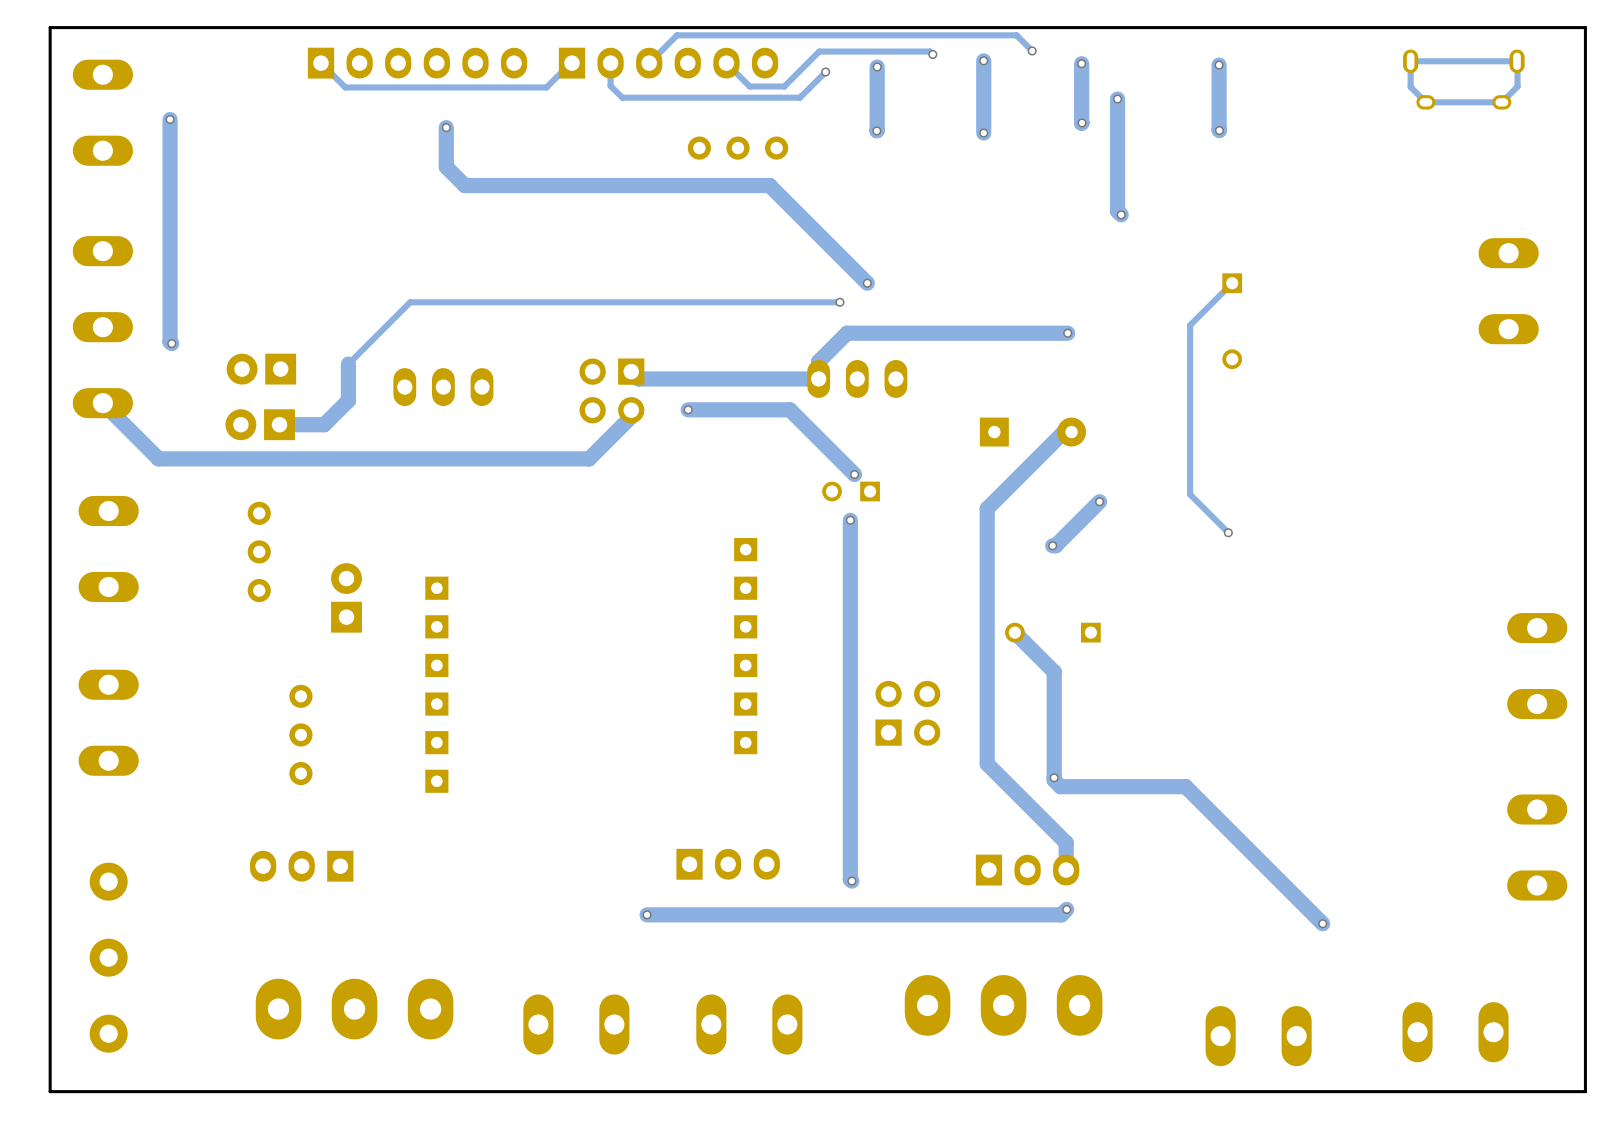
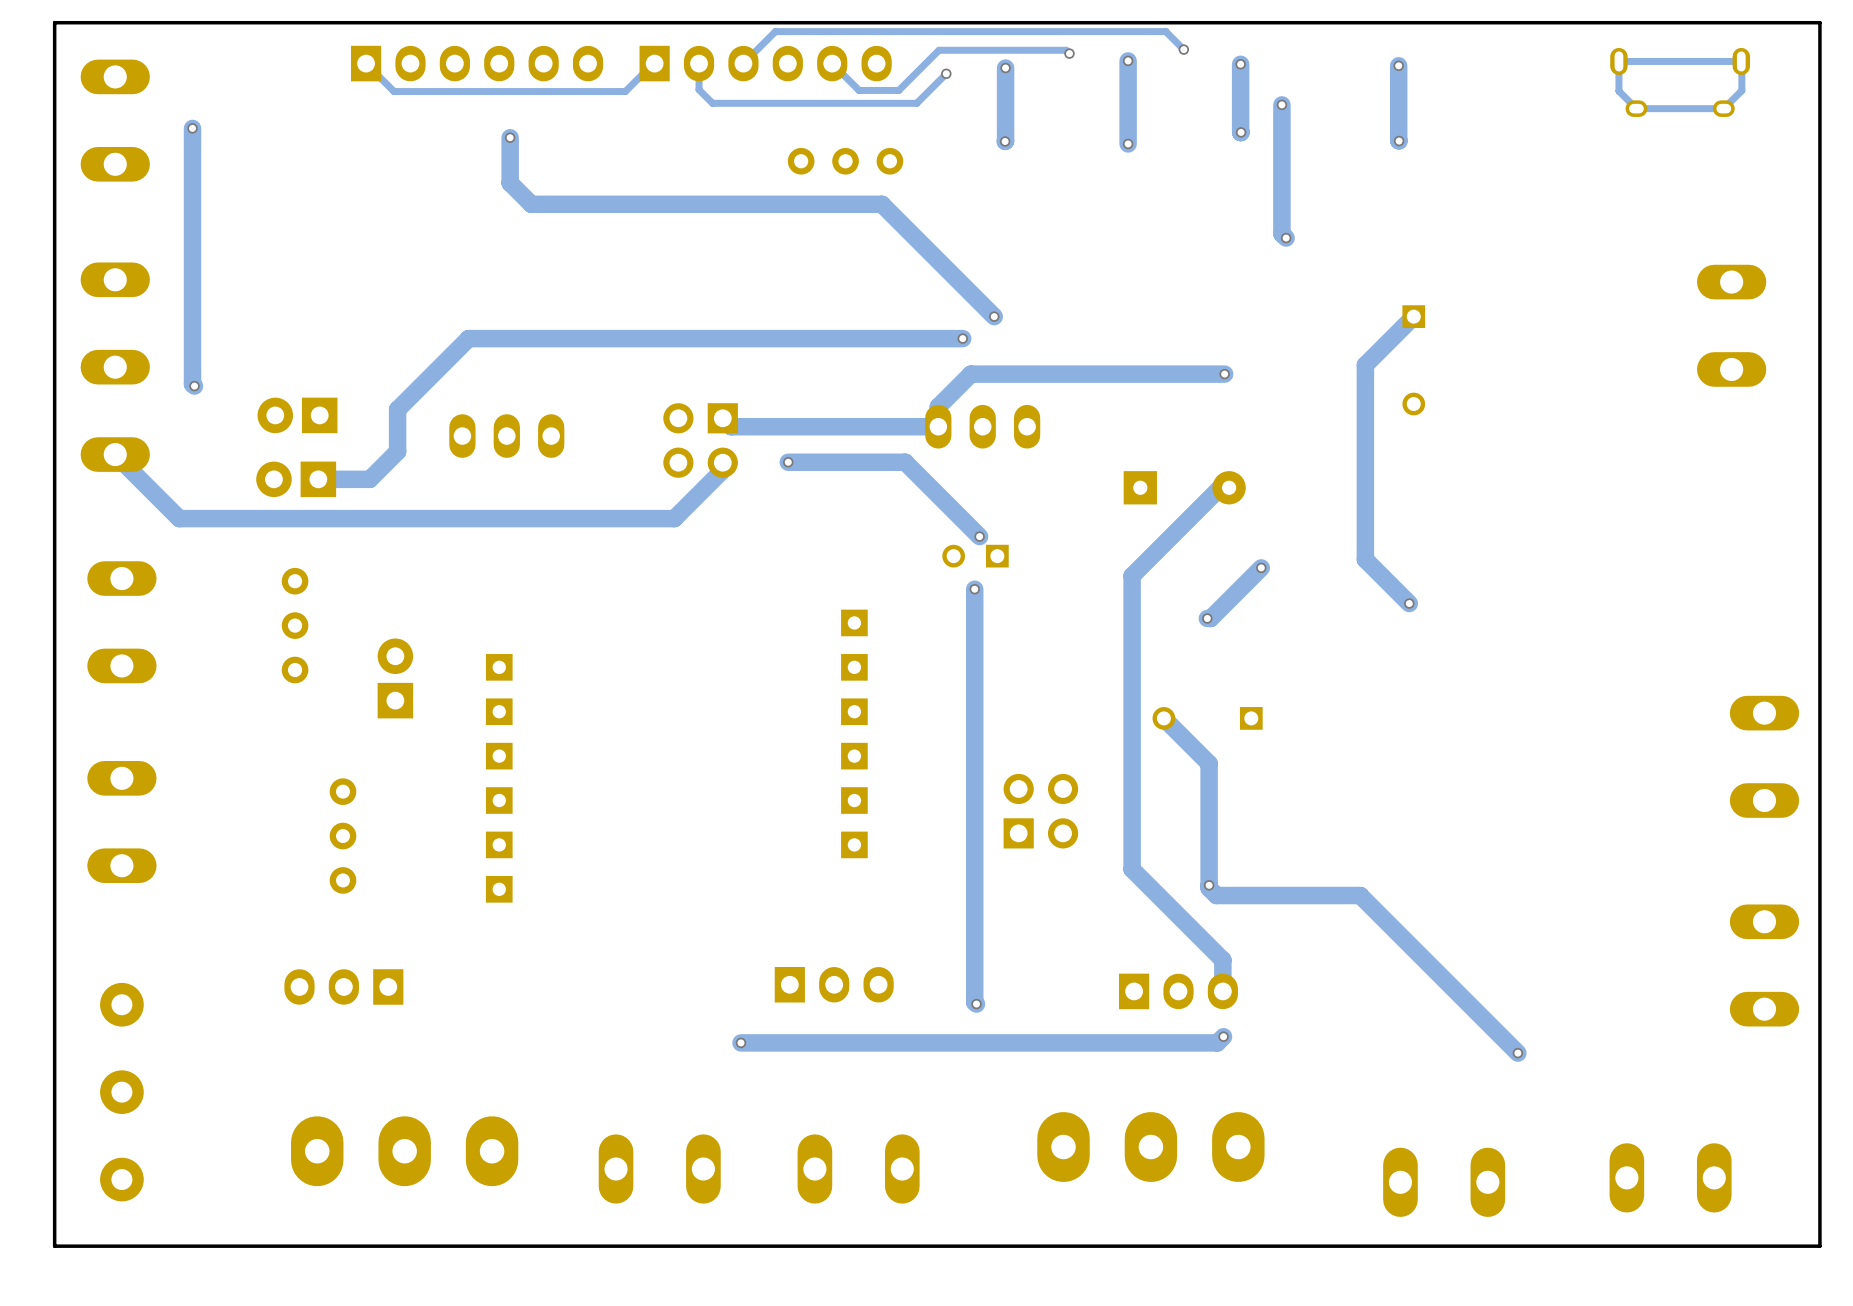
track width: thin (1232, 283) (1190, 325) (1190, 494) (1228, 532) -> thick (1413, 316) (1365, 365) (1365, 559) (1409, 603)
track width: thin (839, 302) (410, 302) (348, 364) -> thick (962, 338) (468, 338) (397, 409)

